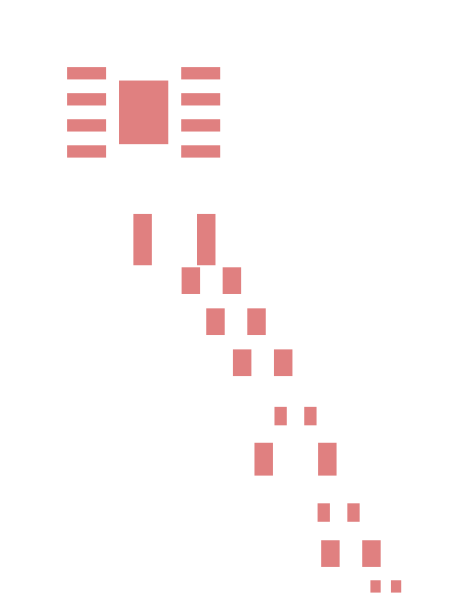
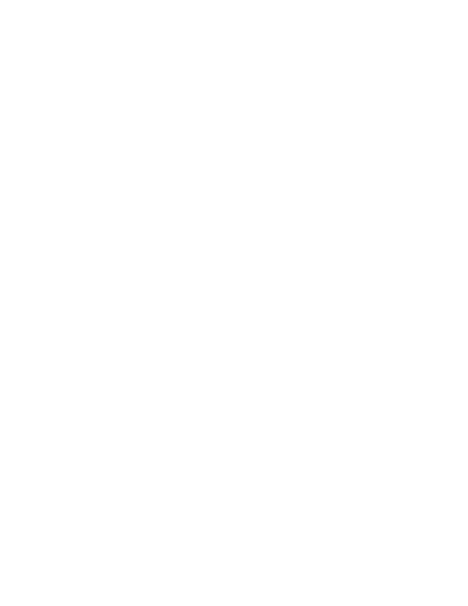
part: (143, 112) -> none
part: (174, 239) -> none
part: (211, 280) -> none
part: (235, 321) -> none
part: (262, 362) -> none
part: (295, 416) -> none
part: (295, 459) -> none
part: (338, 512) -> none
part: (350, 553) -> none
part: (385, 586) -> none

